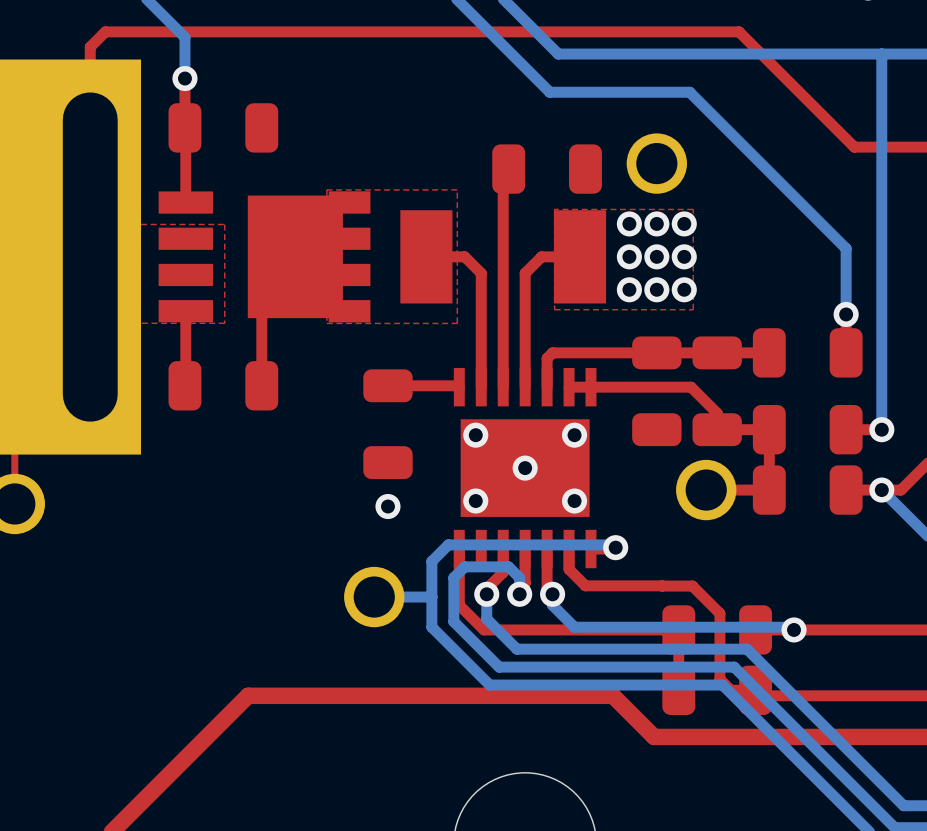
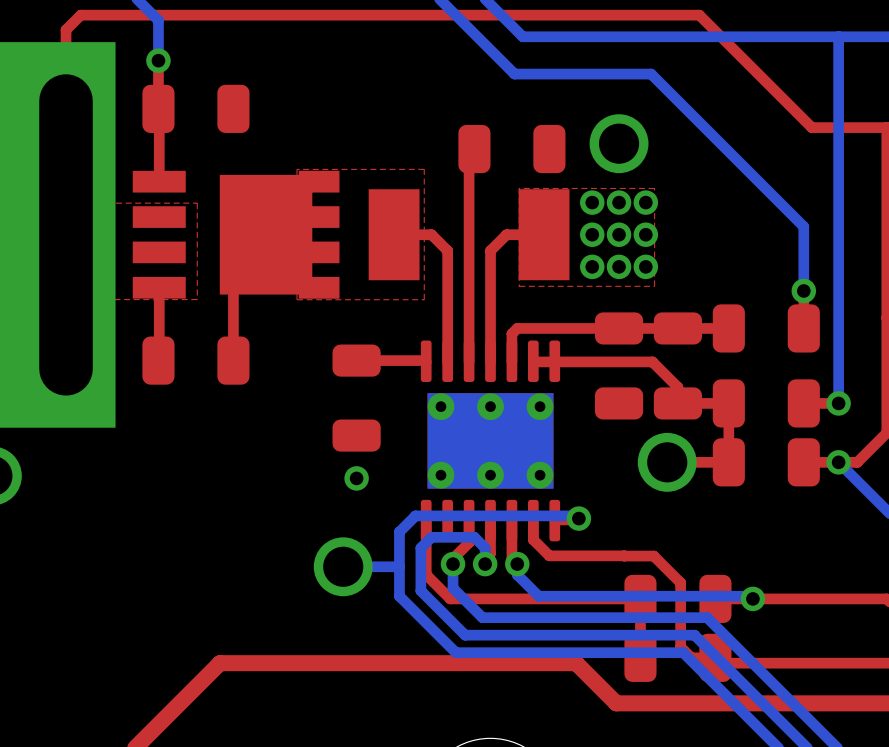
part footprint: [453, 367, 597, 569] -> [420, 340, 561, 542]
via: (475, 435) -> none
via: (574, 435) -> none
via: (525, 468) -> none
via: (475, 501) -> none
via: (574, 501) -> none

